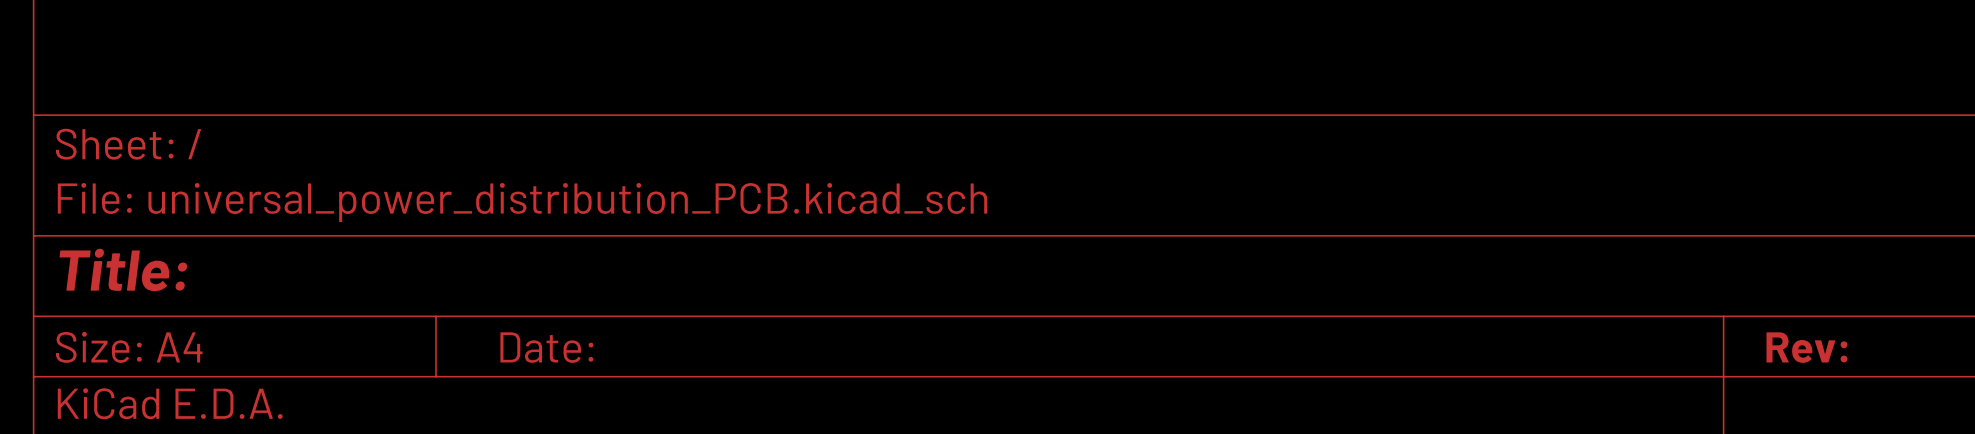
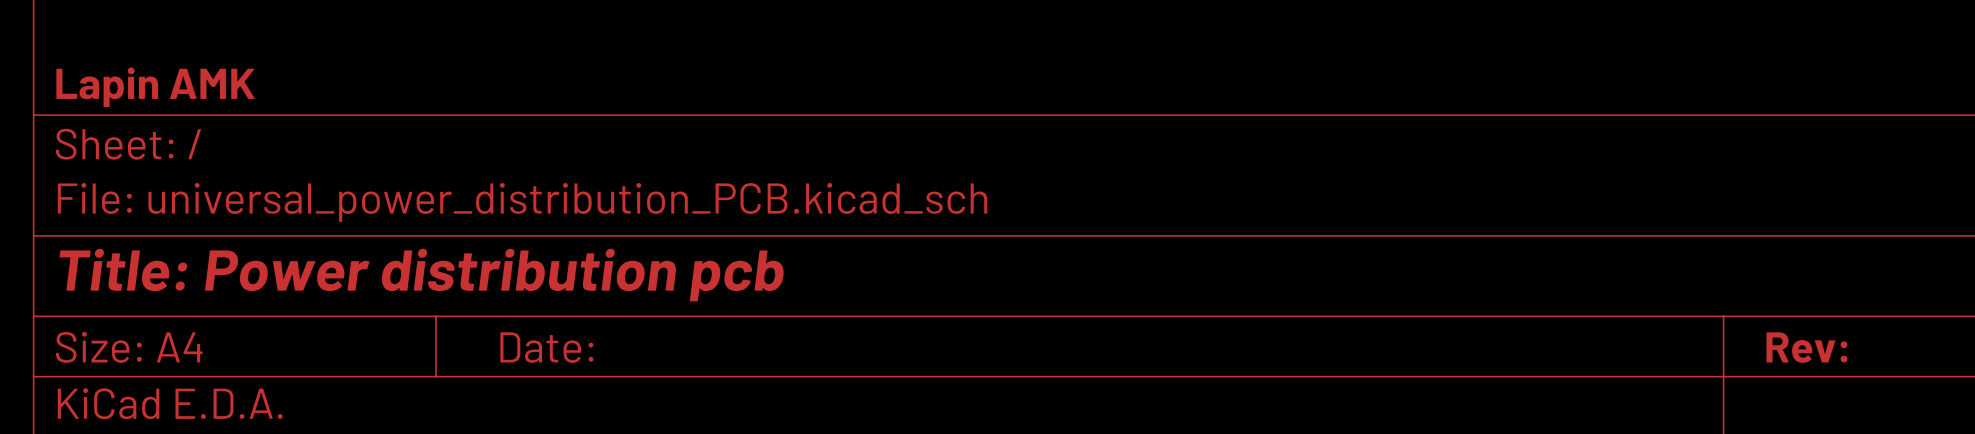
title block: none -> Lapin AMK (155, 87)
title block: Title: (123, 269) -> Title: Power distribution pcb (421, 275)

